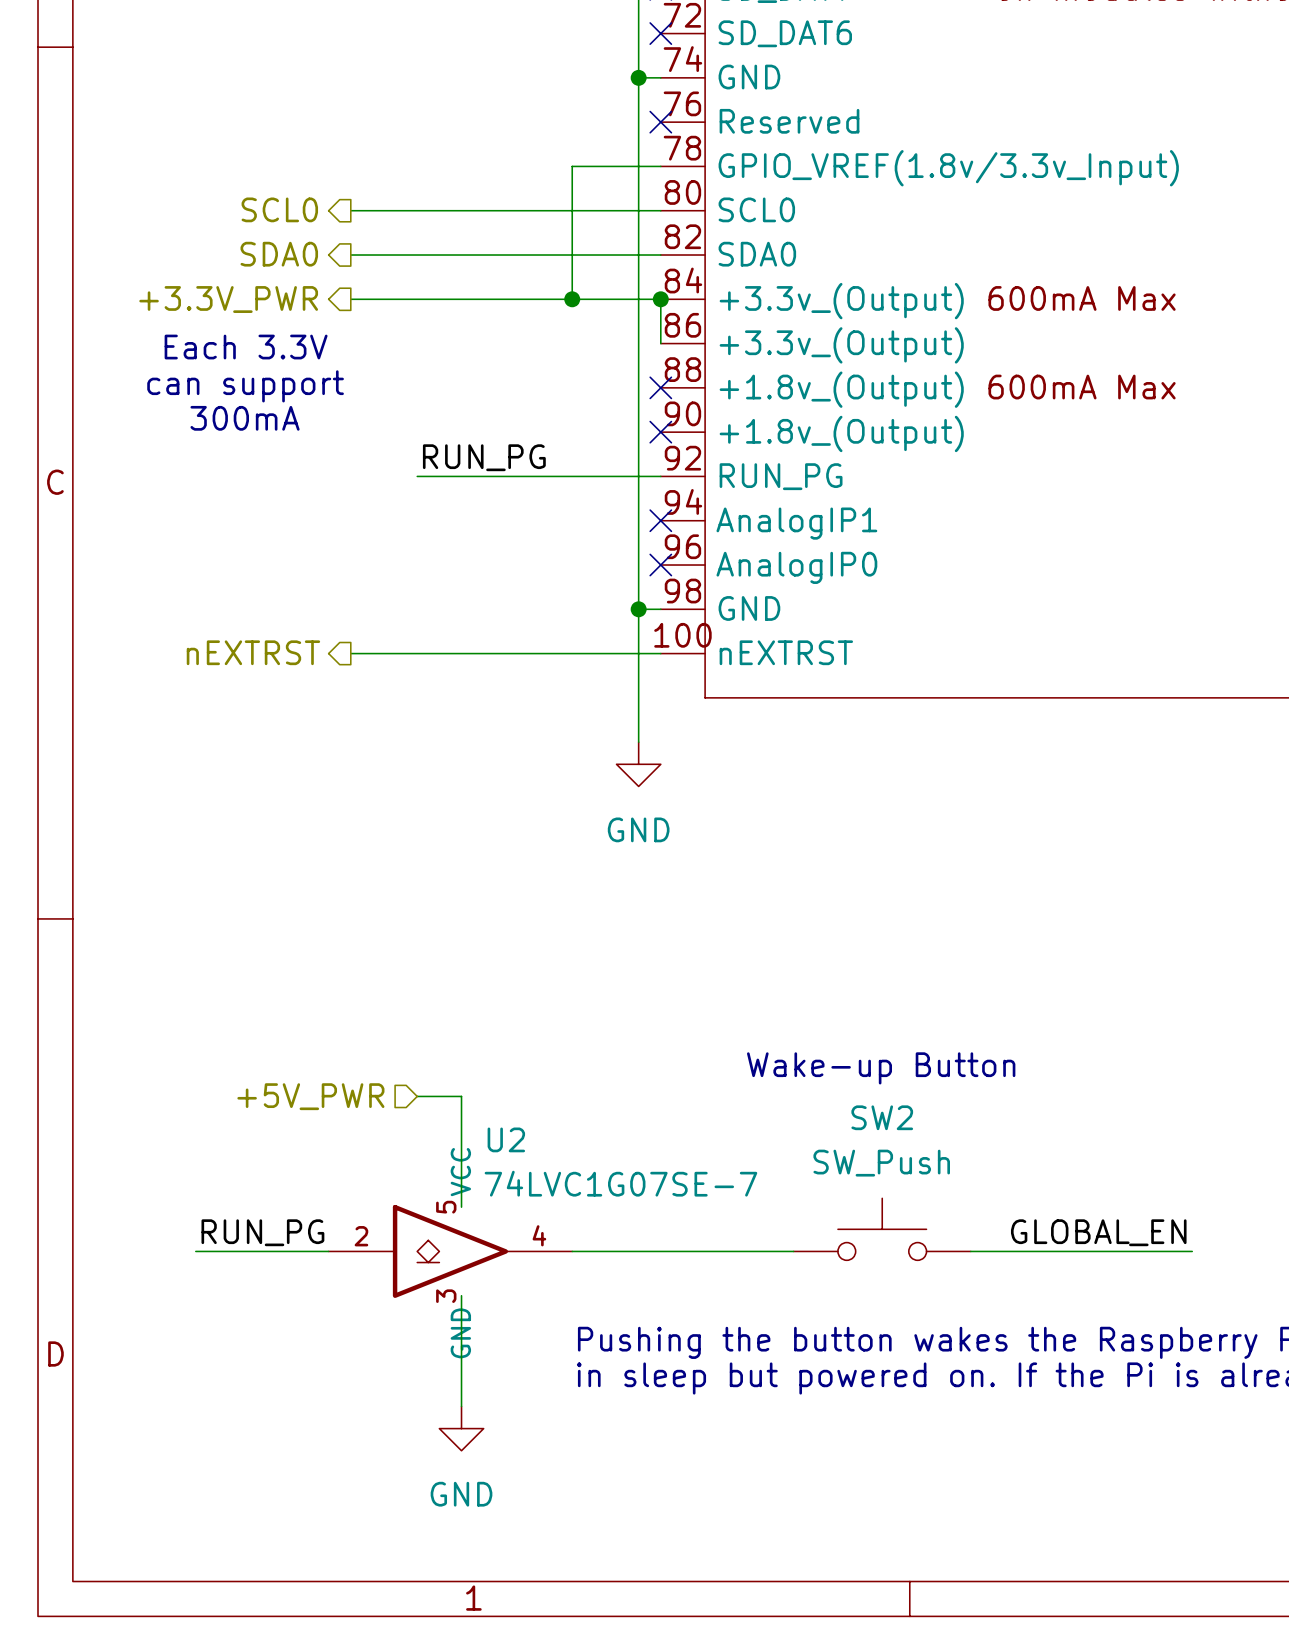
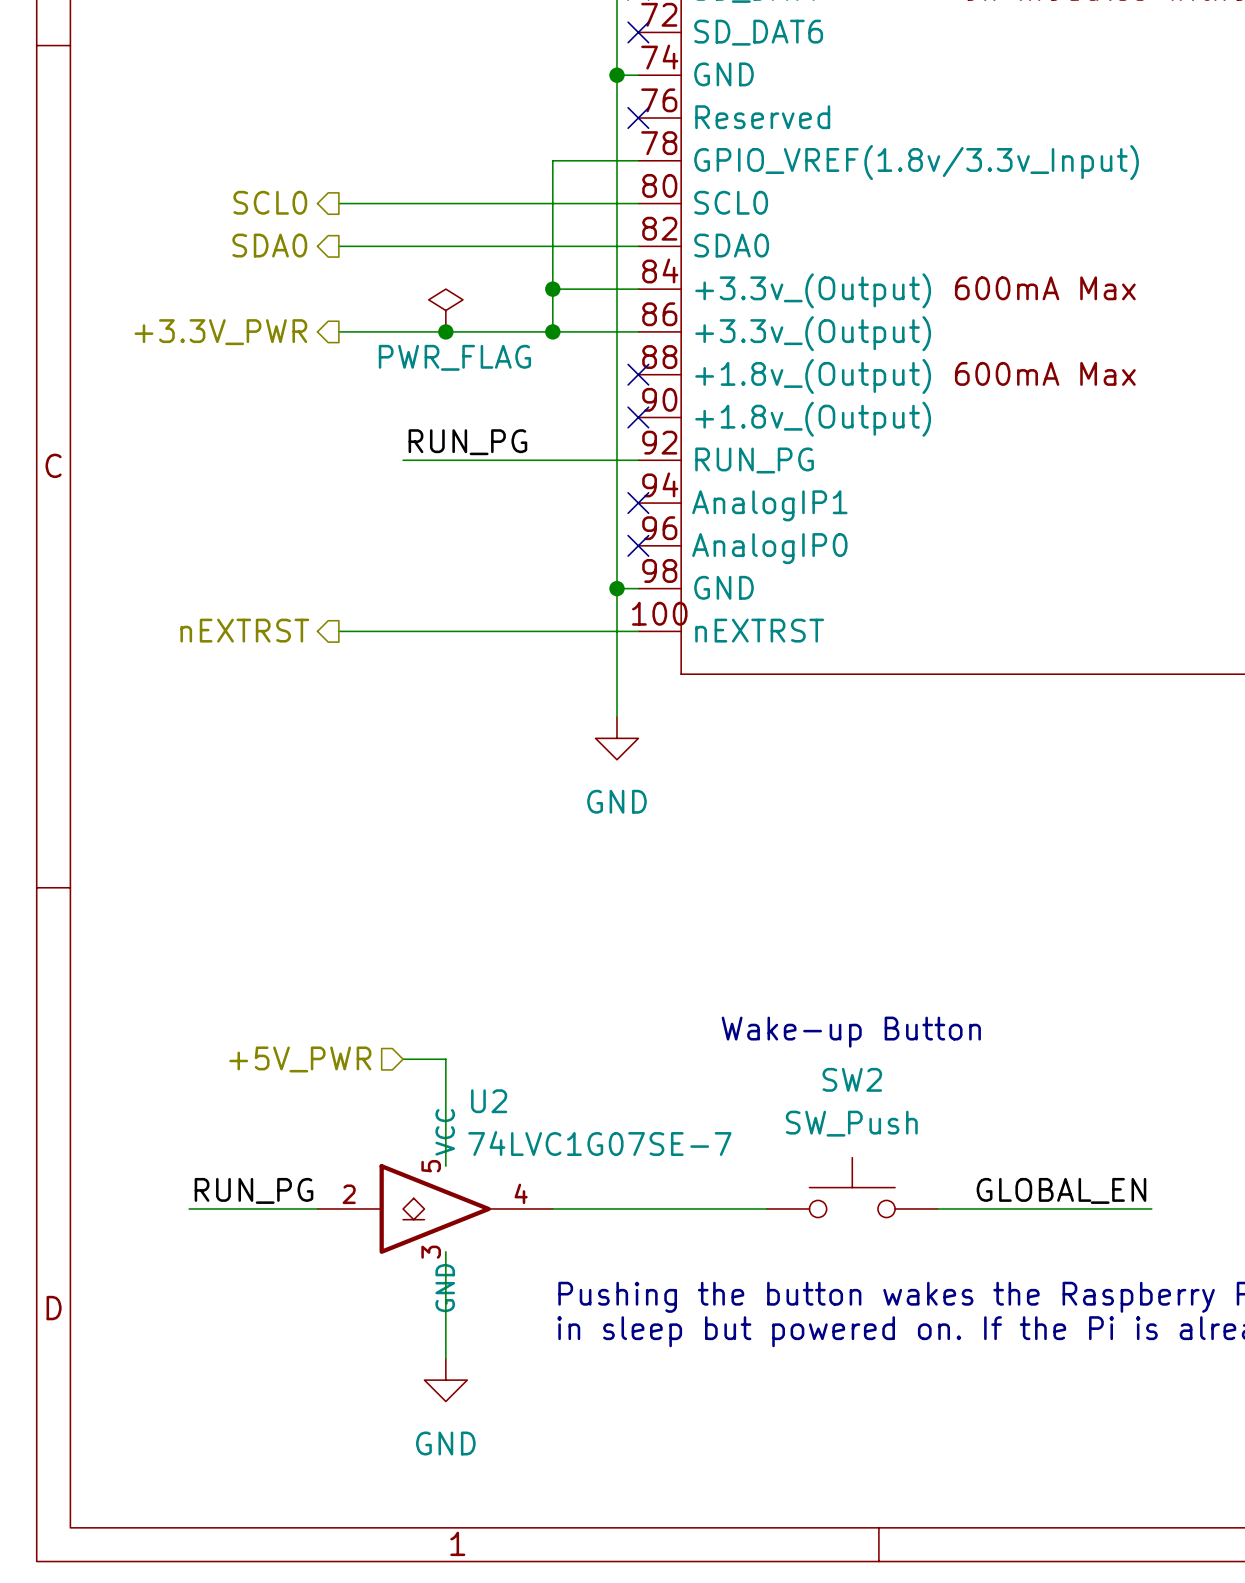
hierarchical label position: +3.3V_PWR (228, 299) -> +3.3V_PWR (220, 332)
wire: (350, 299) (572, 299) -> (552, 331) (552, 289)
wire: (660, 299) (660, 343) -> (338, 331) (638, 331)
junction position: (660, 299) -> (552, 331)
power symbol: none -> PWR_FLAG (445, 310)
junction: none -> (445, 331)
text: Each 3.3V (246, 347) -> none
text: can support (245, 386) -> none
text: 300mA (245, 418) -> none

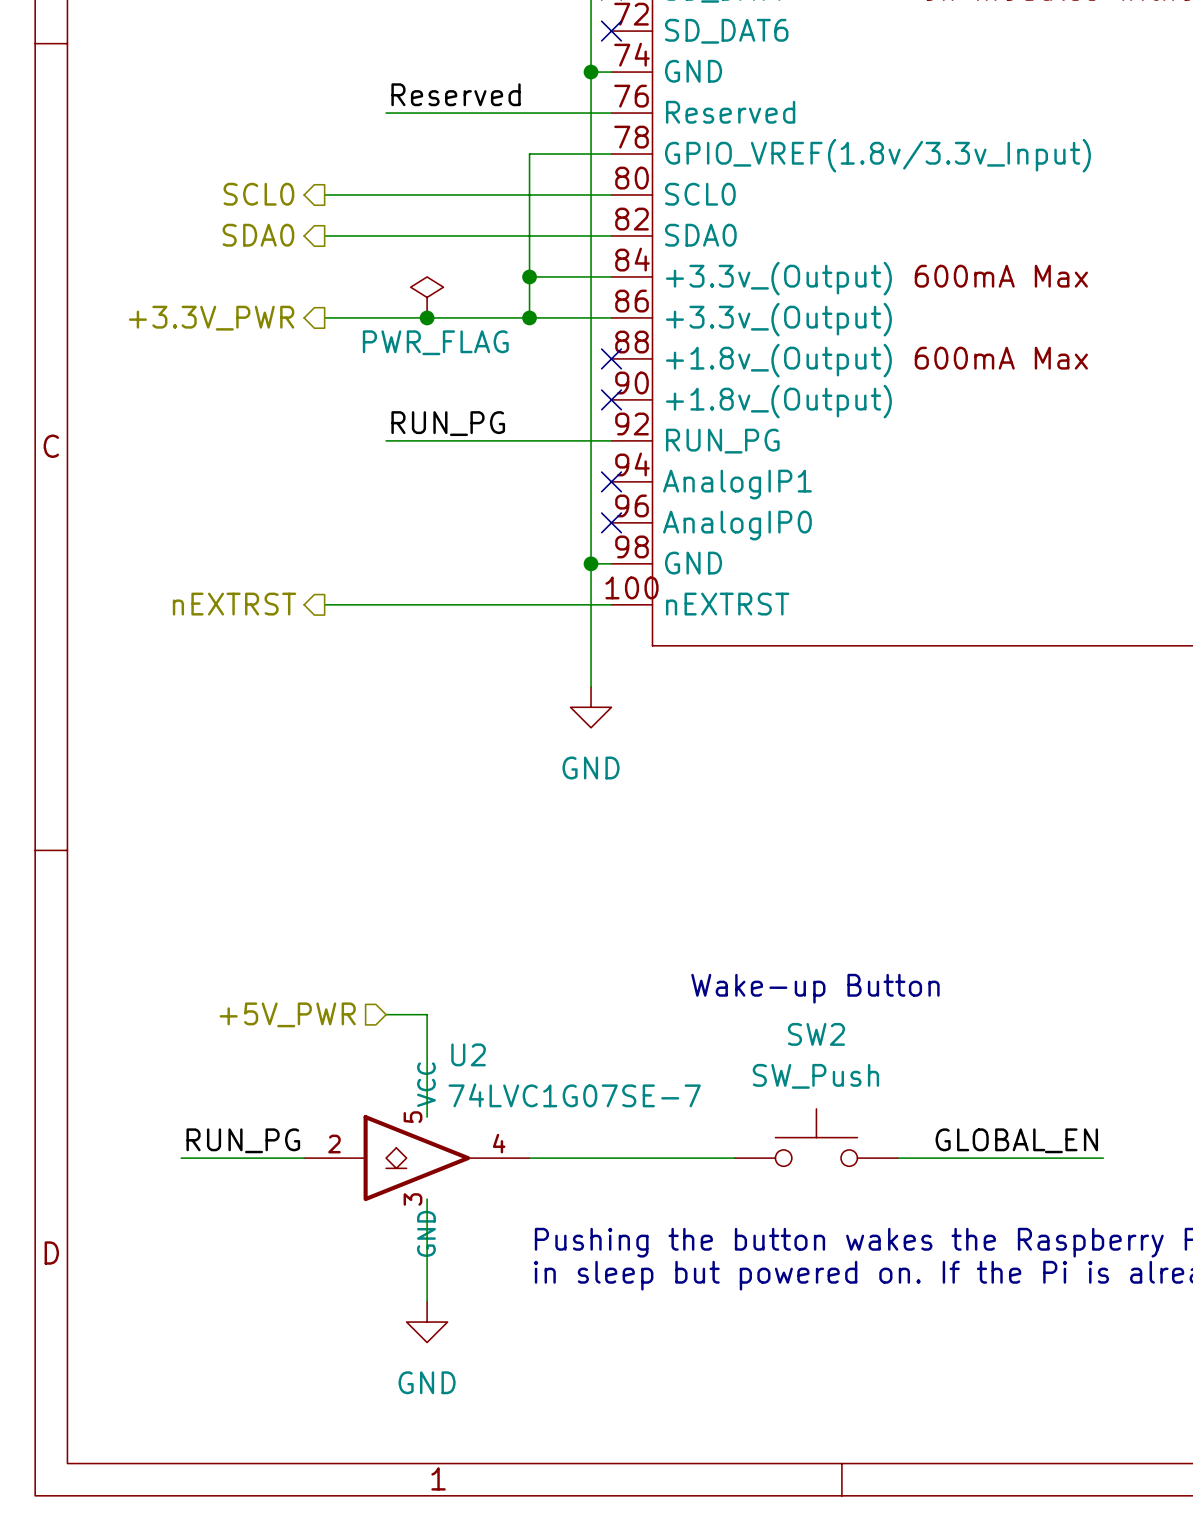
label: none -> Reserved (456, 94)
wire: none -> (386, 113) (611, 113)
no-connect mark: (638, 118) -> none

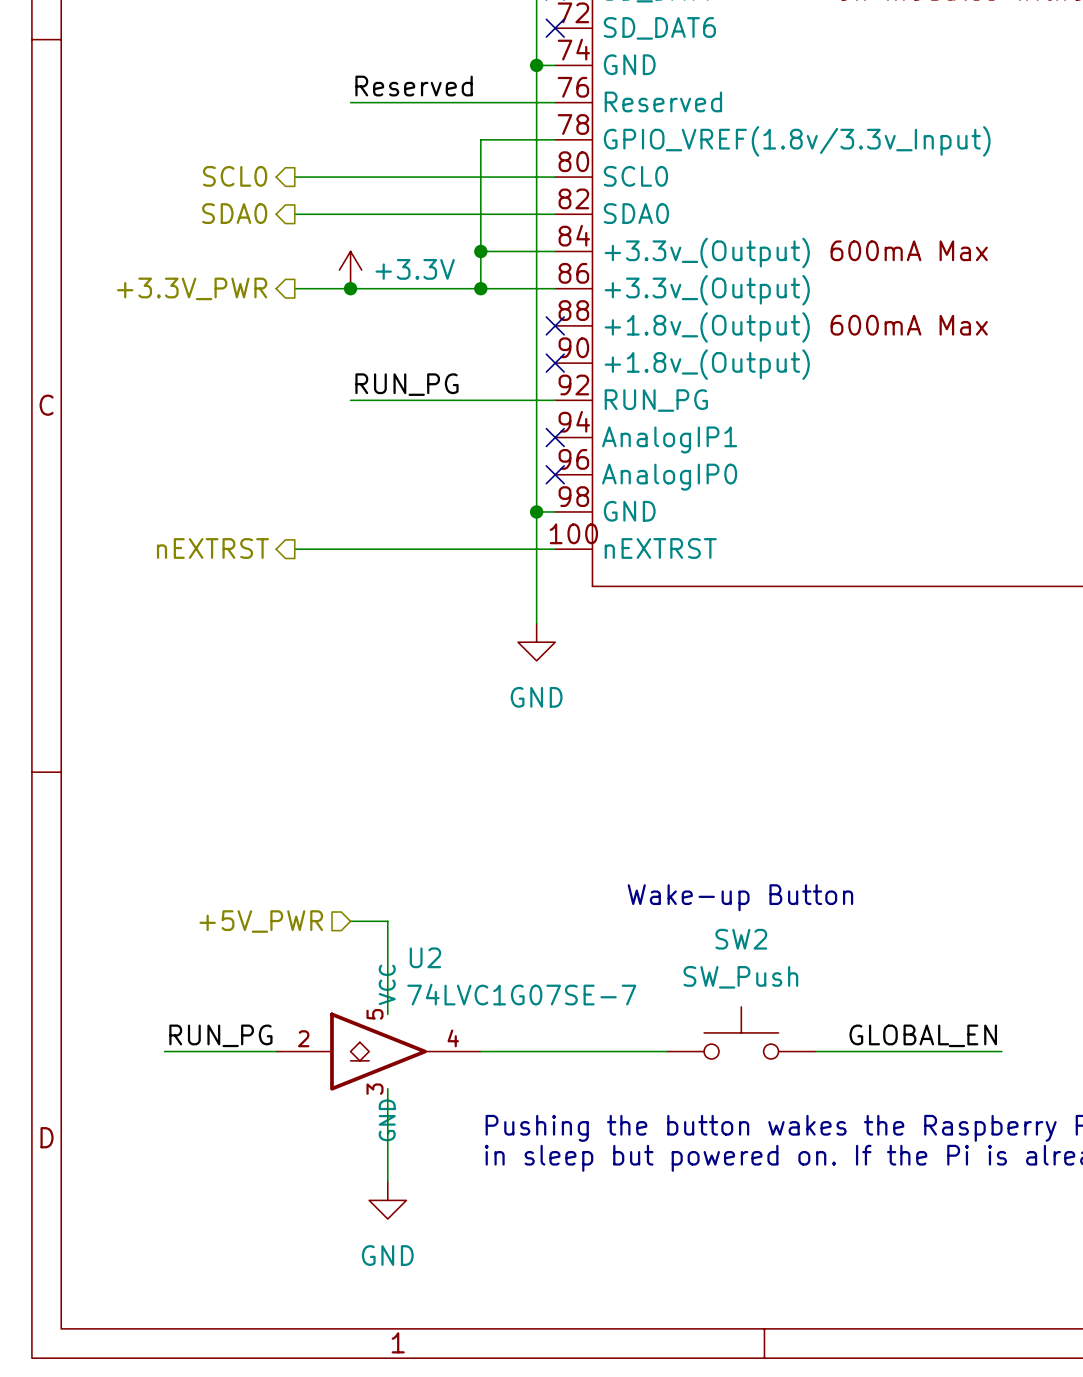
power symbol: none -> +3.3V (350, 270)
power symbol: PWR_FLAG (427, 297) -> none
junction position: (427, 317) -> (350, 288)

